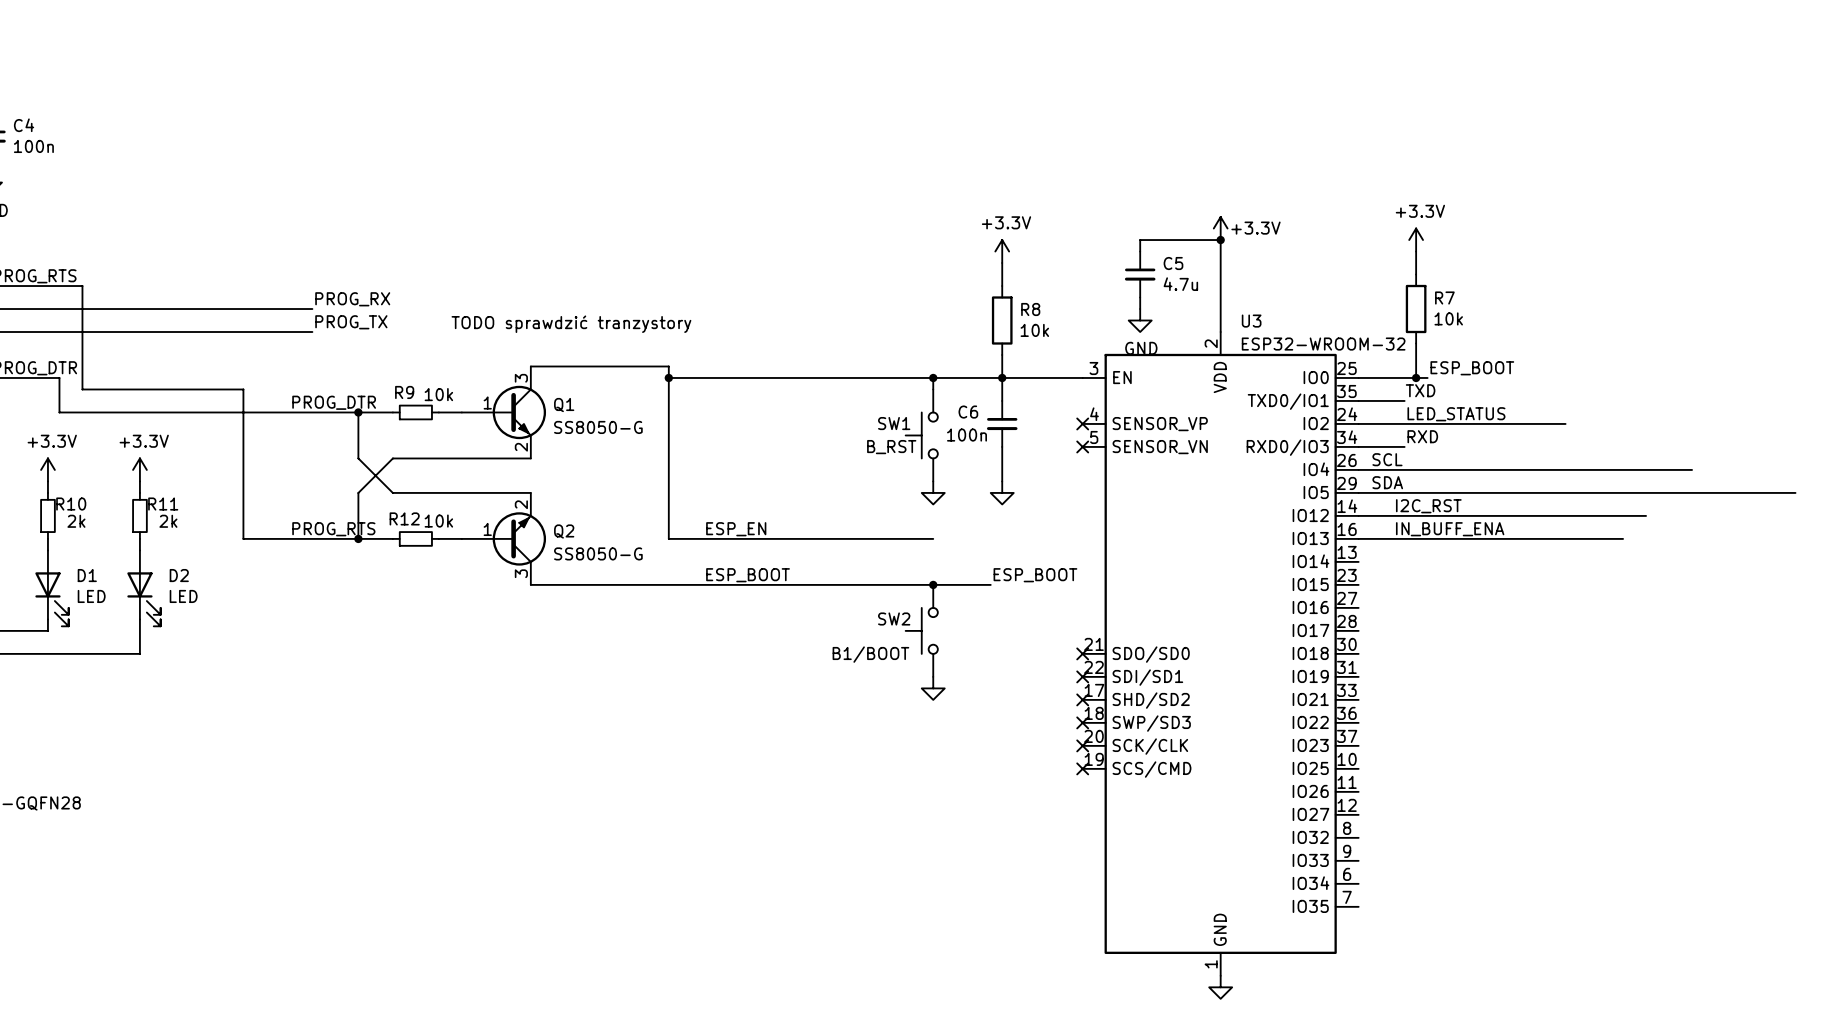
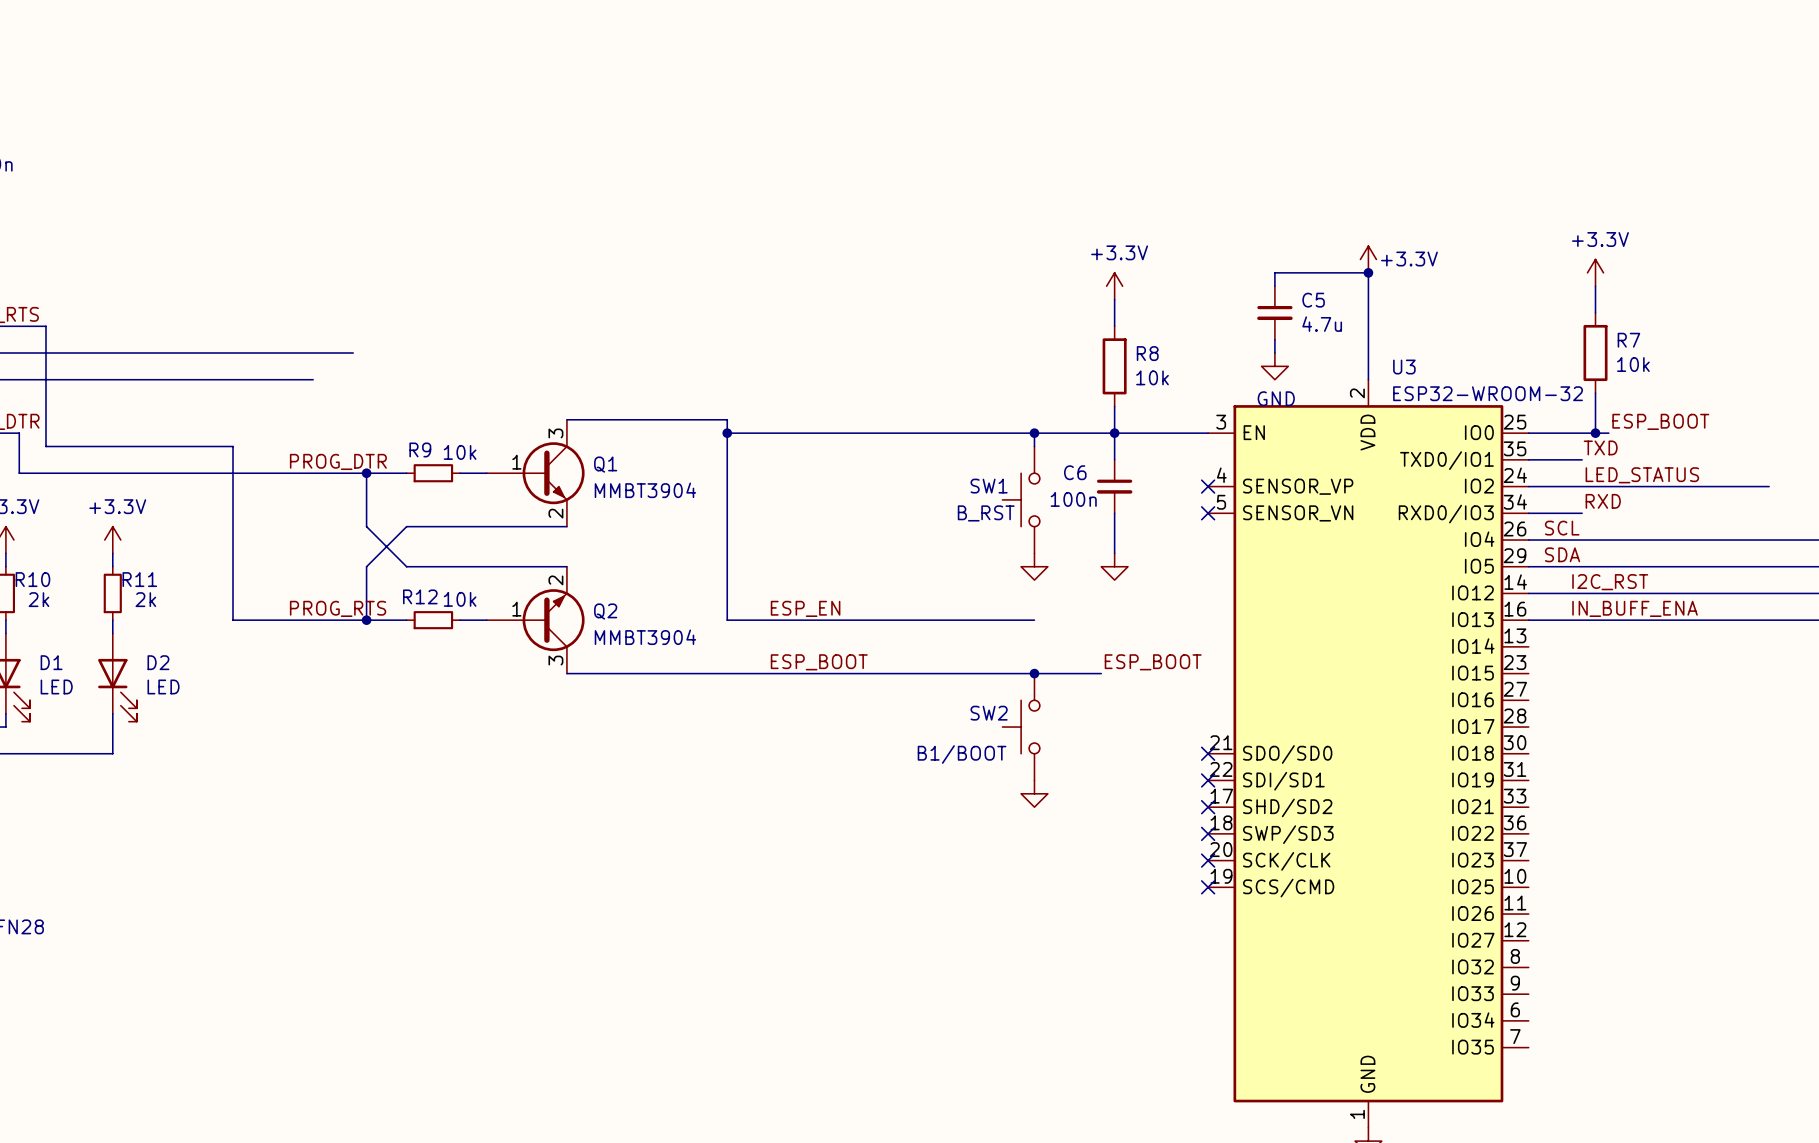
label: PROG_RX (352, 299) -> none
wire: none -> (313, 353) (353, 353)
label: PROG_TX (351, 322) -> none
text: TODO sprawdzić tranzystory (571, 324) -> none
Q1 value: SS8050-G (598, 427) -> MMBT3904 (645, 490)
Q2 value: SS8050-G (598, 553) -> MMBT3904 (645, 637)

